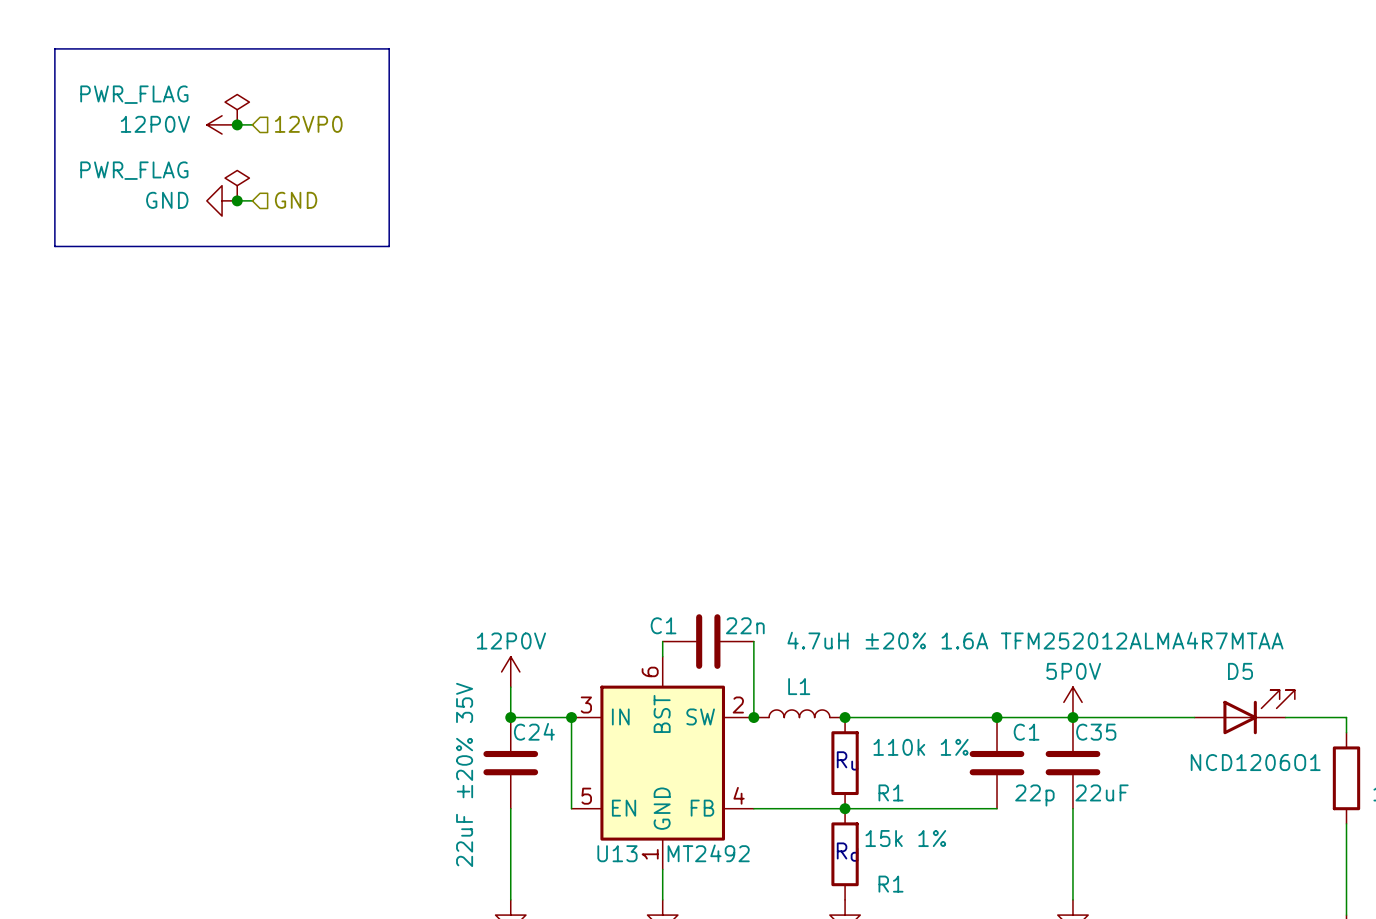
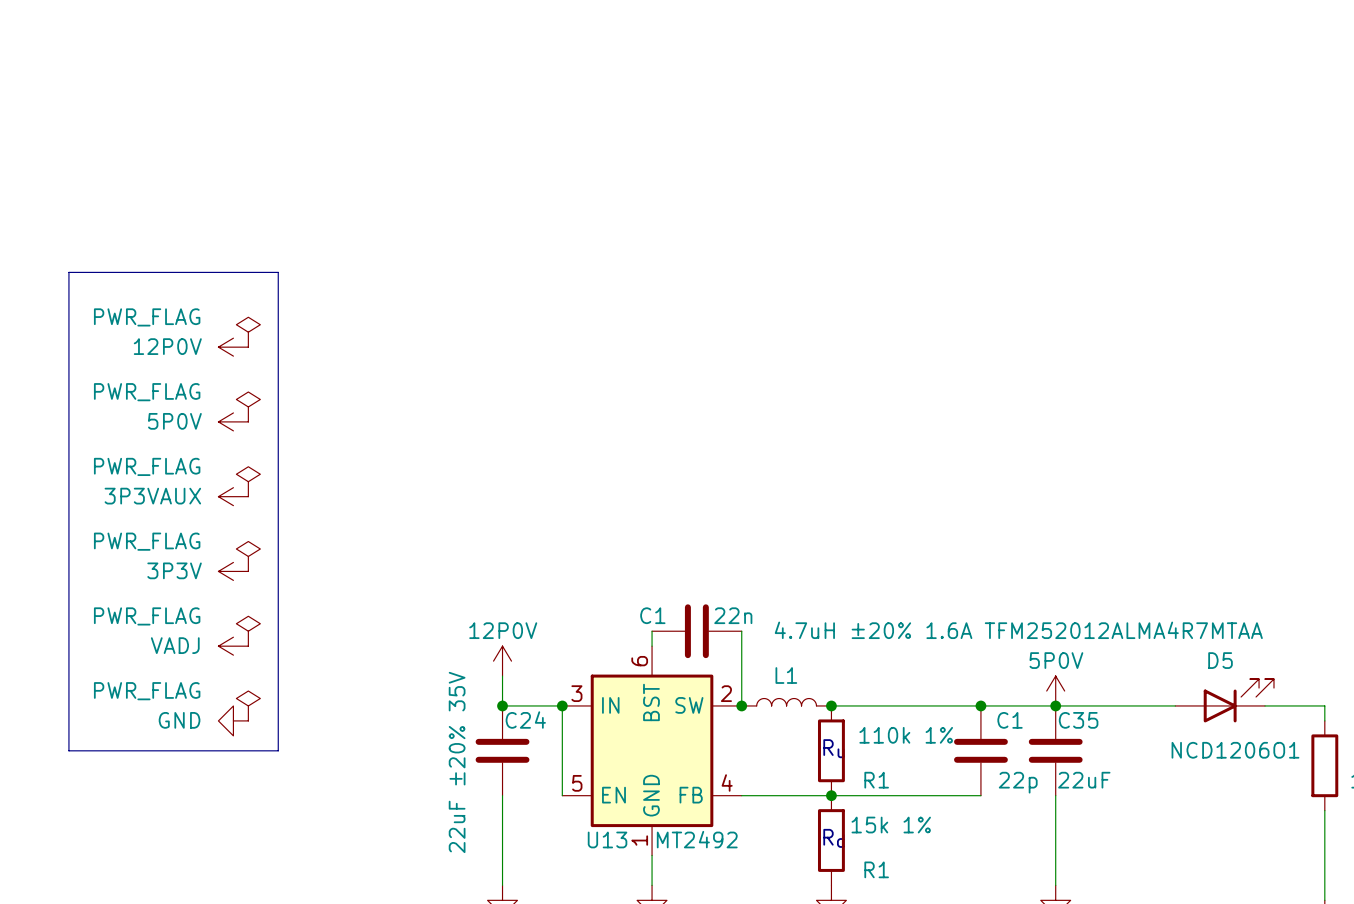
line: (54, 48) (389, 48) (389, 246) (54, 246) (54, 48) -> none
power symbol: PWR_FLAG (237, 109) -> none
power symbol position: 12P0V (222, 124) -> 12P0V (233, 347)
wire: (237, 124) (252, 124) -> none
junction: (237, 124) -> none
hierarchical label: 12VP0 (308, 124) -> none
power symbol: PWR_FLAG (237, 185) -> none
power symbol: GND (222, 200) -> none
wire: (237, 200) (252, 200) -> none
junction: (237, 200) -> none
hierarchical label: GND (296, 200) -> none
line: none -> (68, 272) (68, 750) (278, 750) (278, 272) (68, 272)
power symbol: none -> PWR_FLAG (248, 332)
power symbol: none -> PWR_FLAG (248, 406)
power symbol: none -> 5P0V (233, 421)
power symbol: none -> PWR_FLAG (248, 481)
power symbol: none -> 3P3VAUX (233, 496)
power symbol: none -> PWR_FLAG (248, 556)
power symbol: none -> 3P3V (233, 571)
power symbol: none -> PWR_FLAG (248, 631)
power symbol: none -> VADJ (233, 646)
power symbol: none -> PWR_FLAG (248, 705)
power symbol: none -> GND (233, 720)

